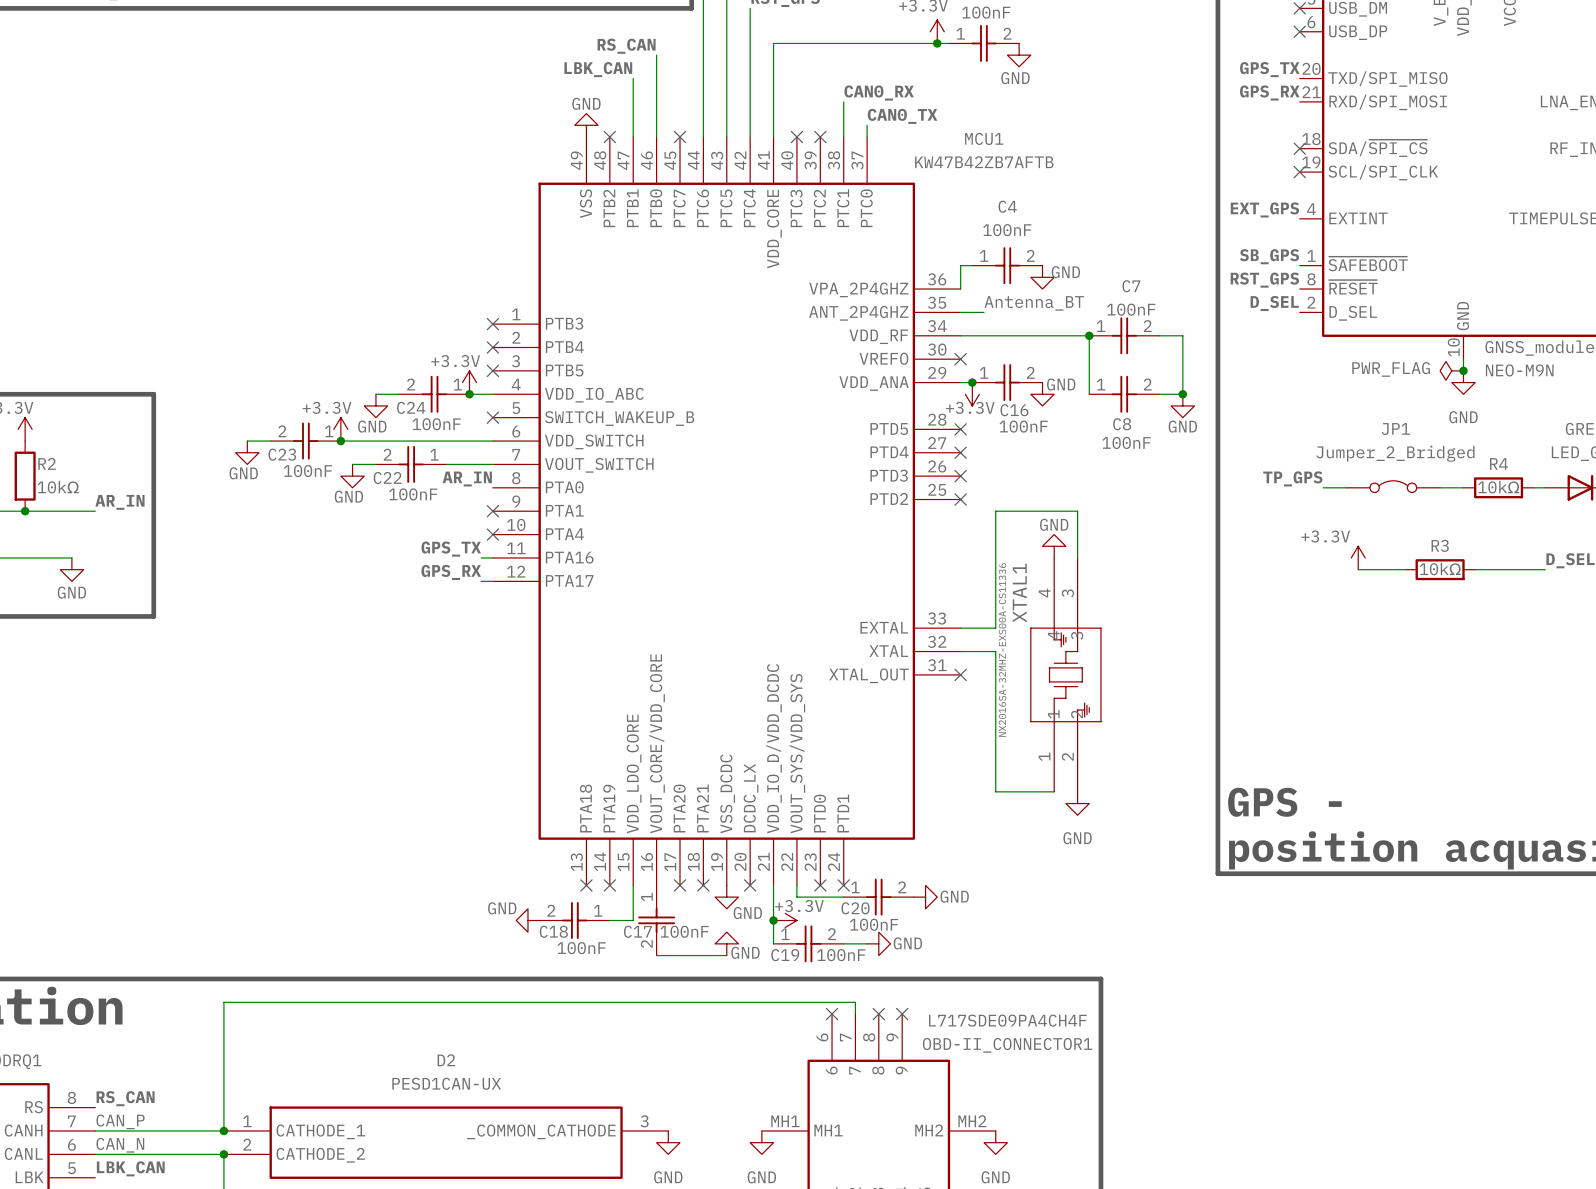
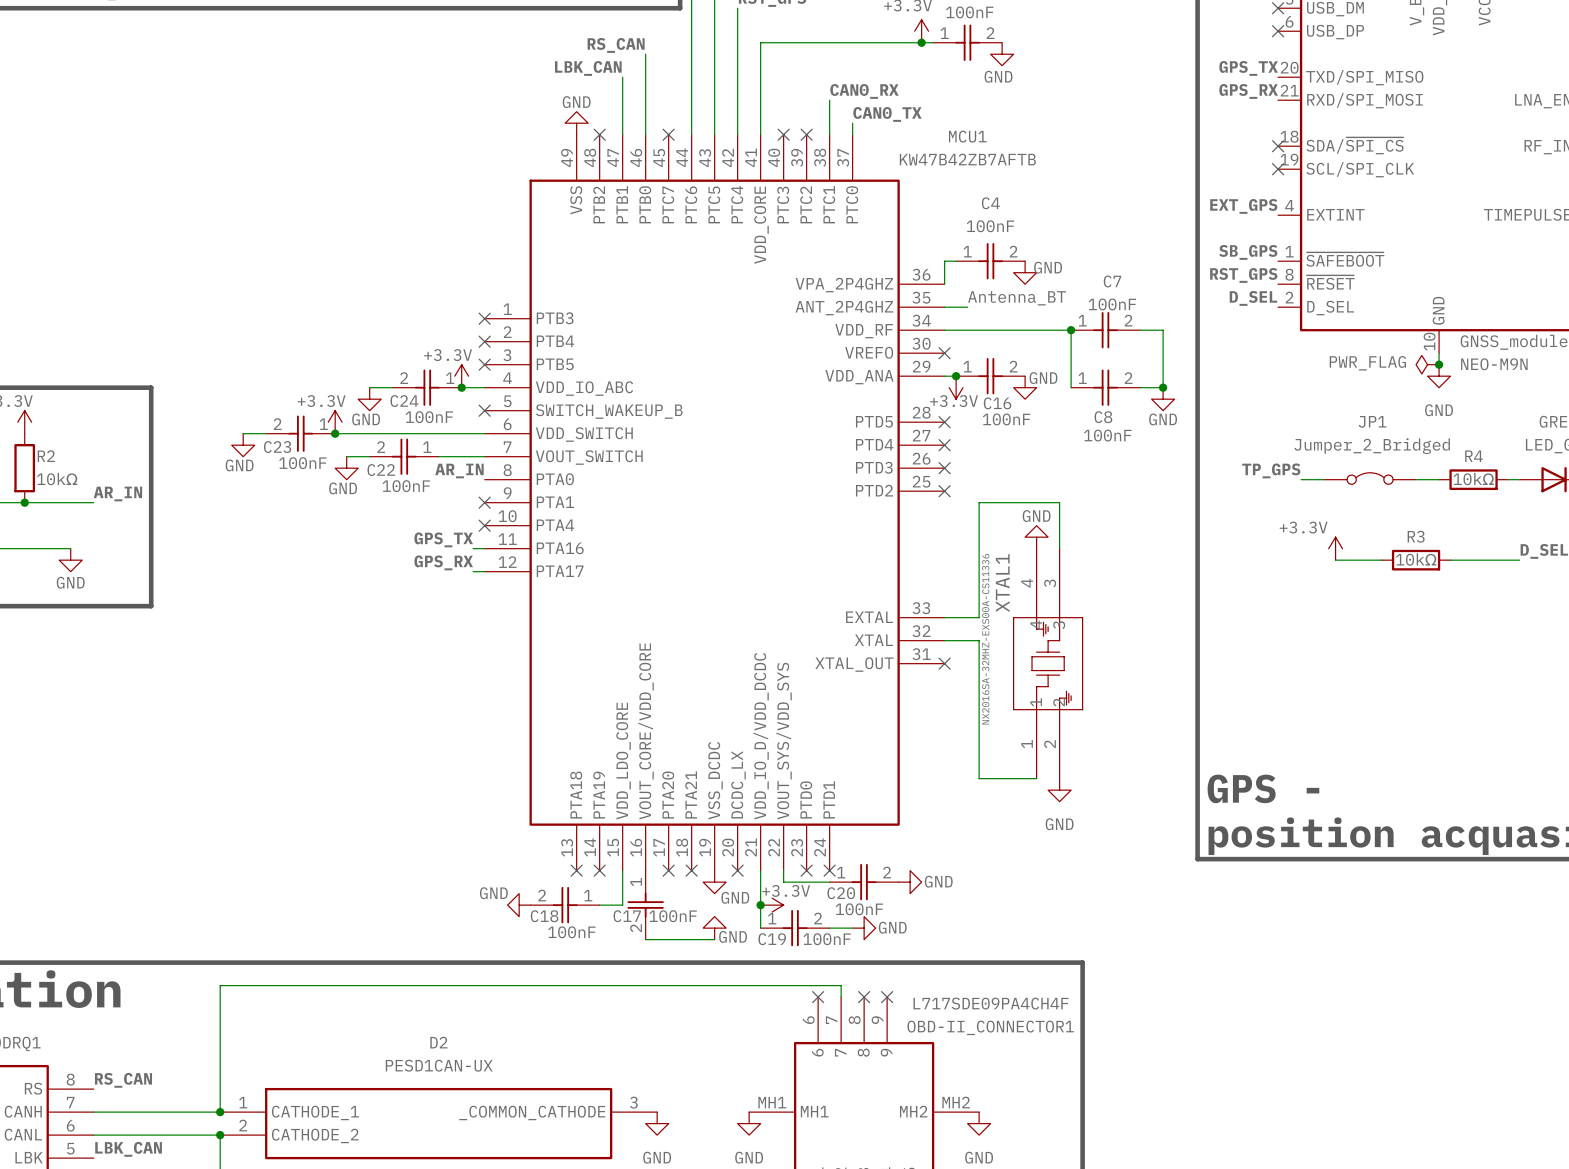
label: CAN_P (120, 1121) -> none
label: CAN_N (120, 1145) -> none

